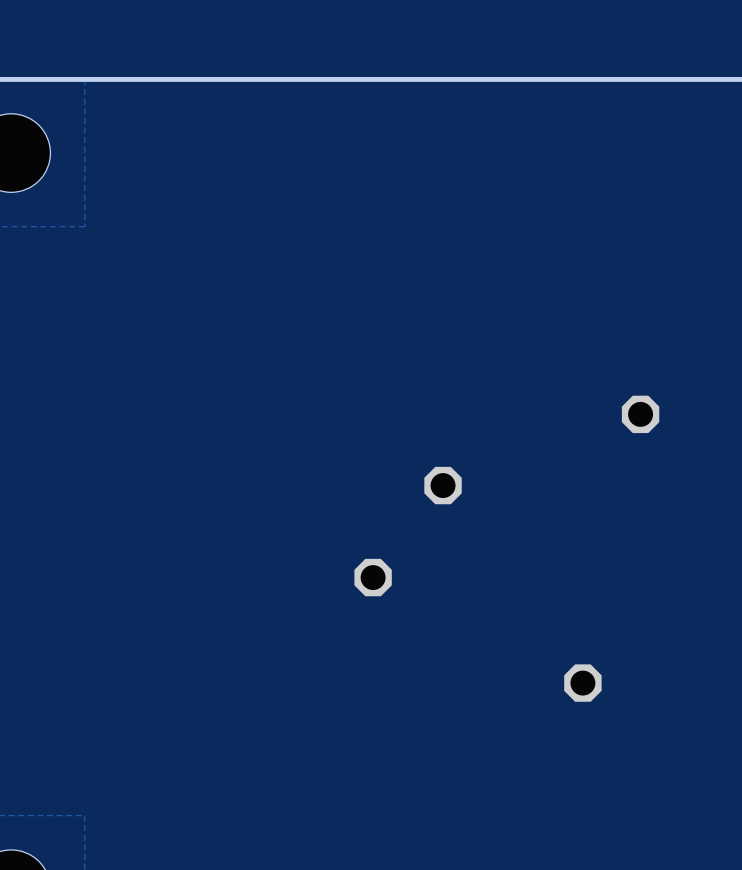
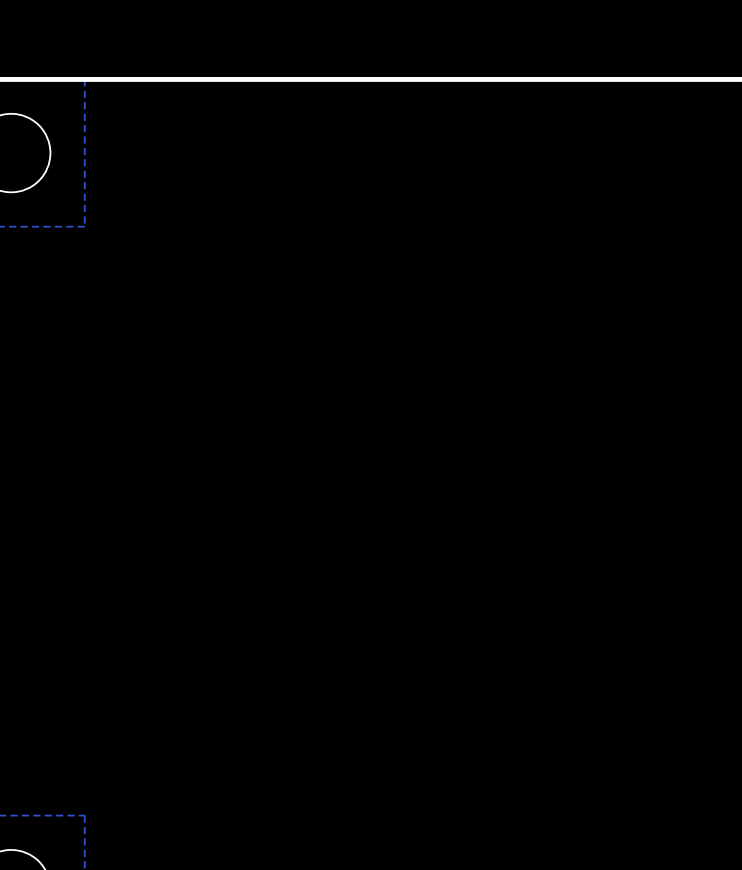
part: (640, 414) -> none
part: (443, 485) -> none
part: (373, 577) -> none
part: (582, 683) -> none

